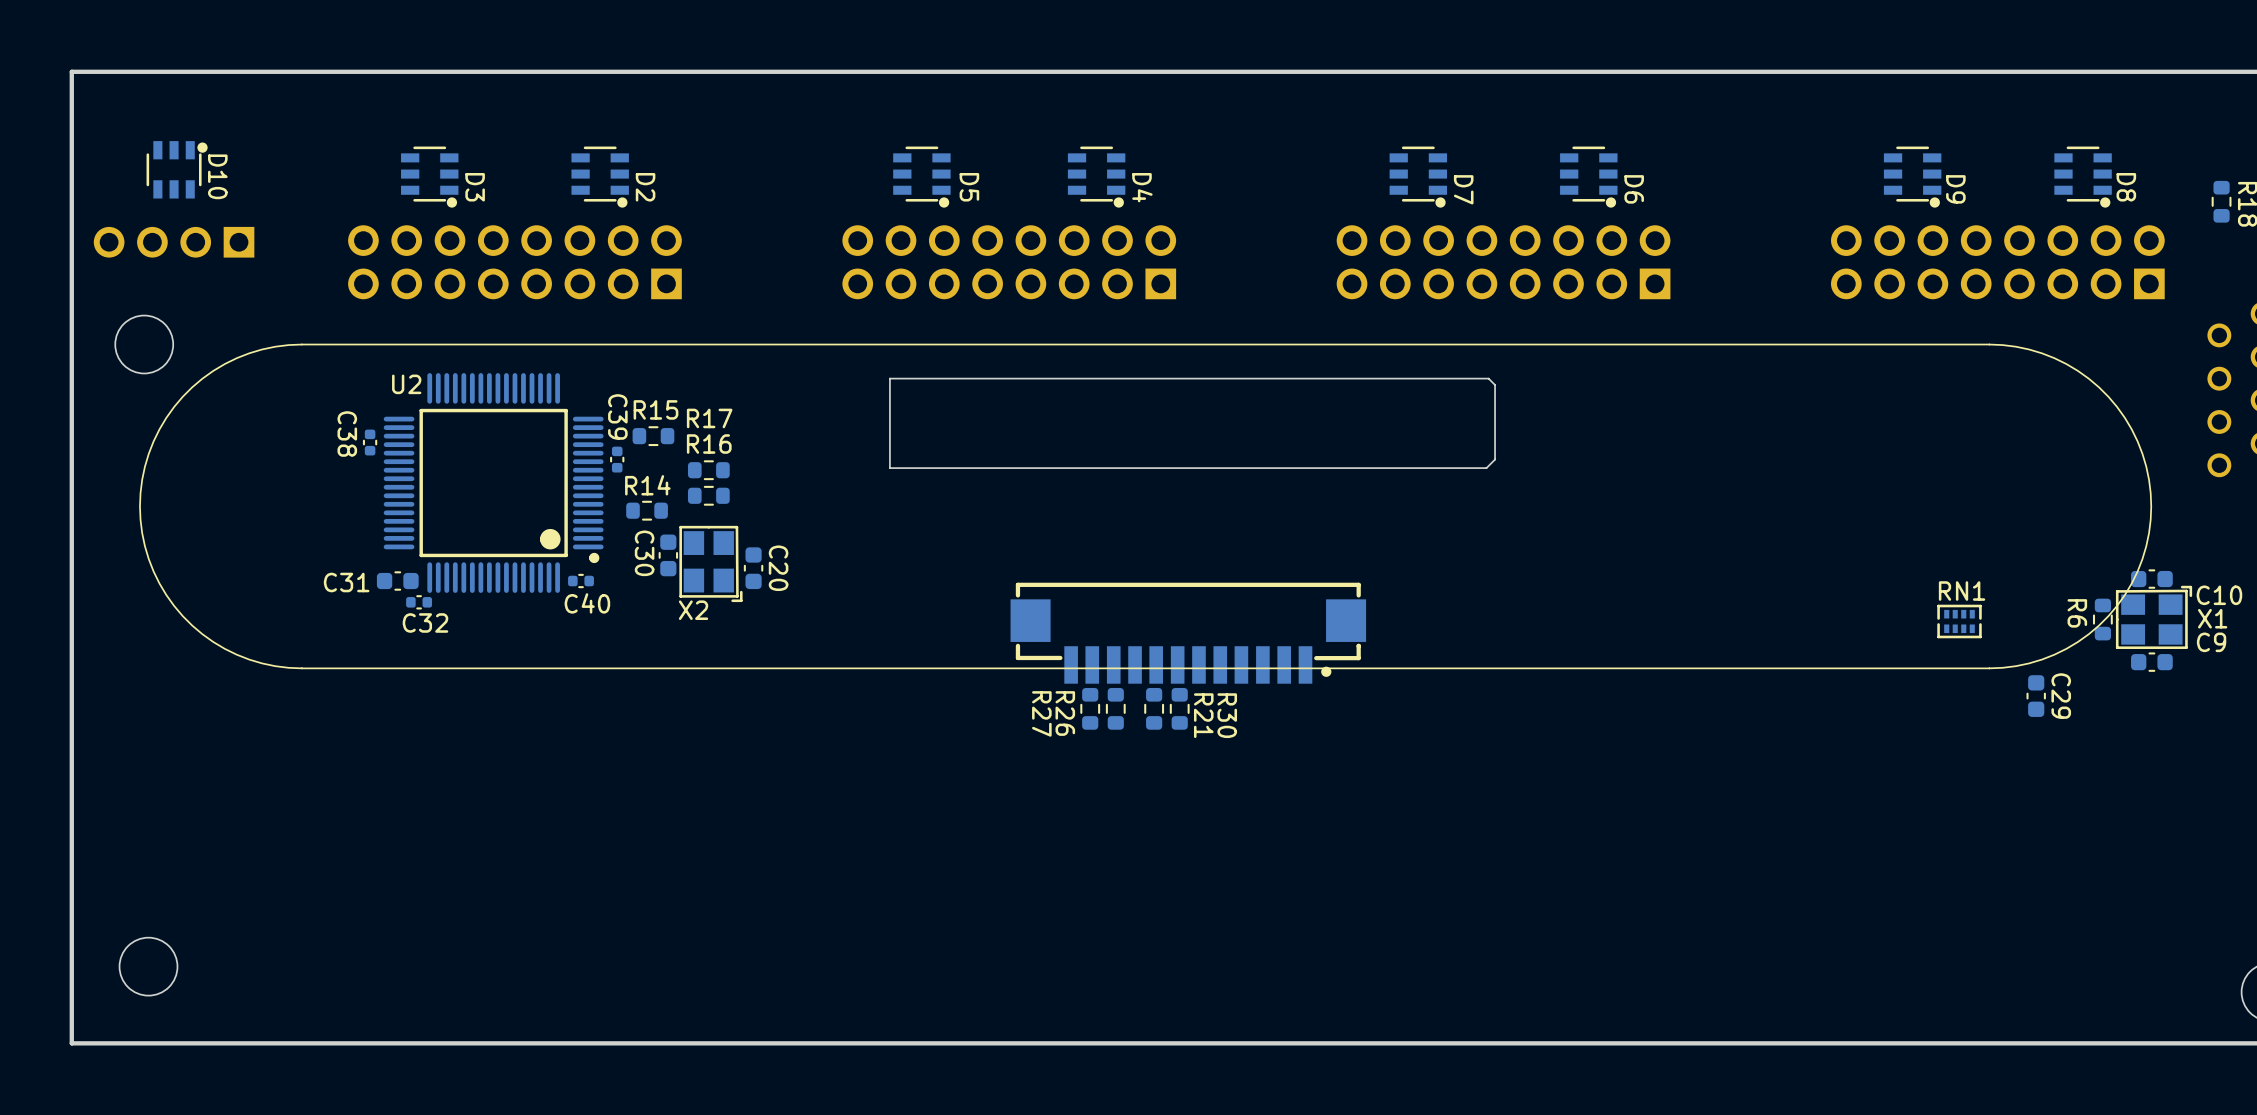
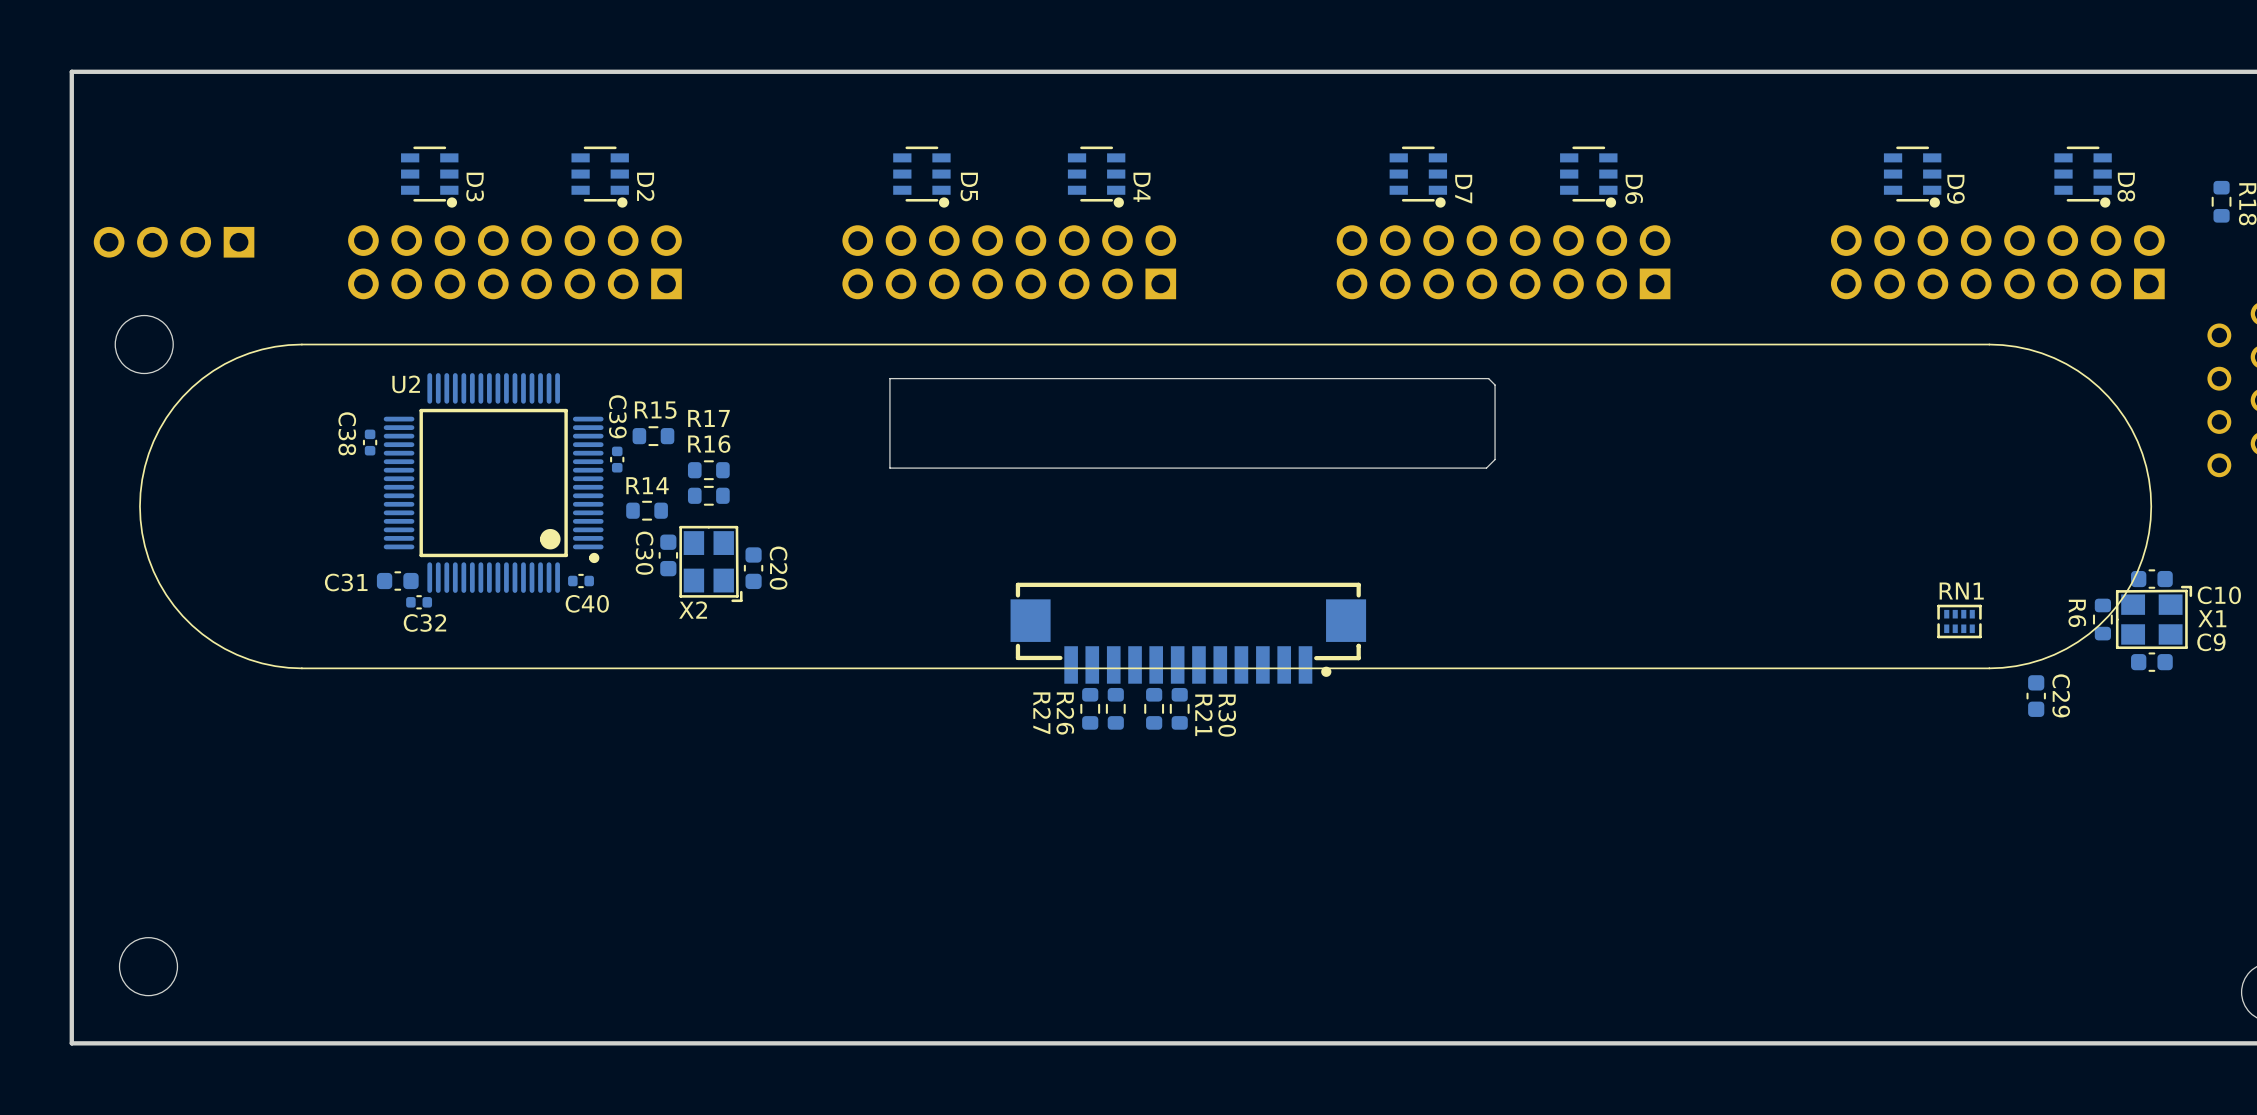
D10: (177, 169) -> none

